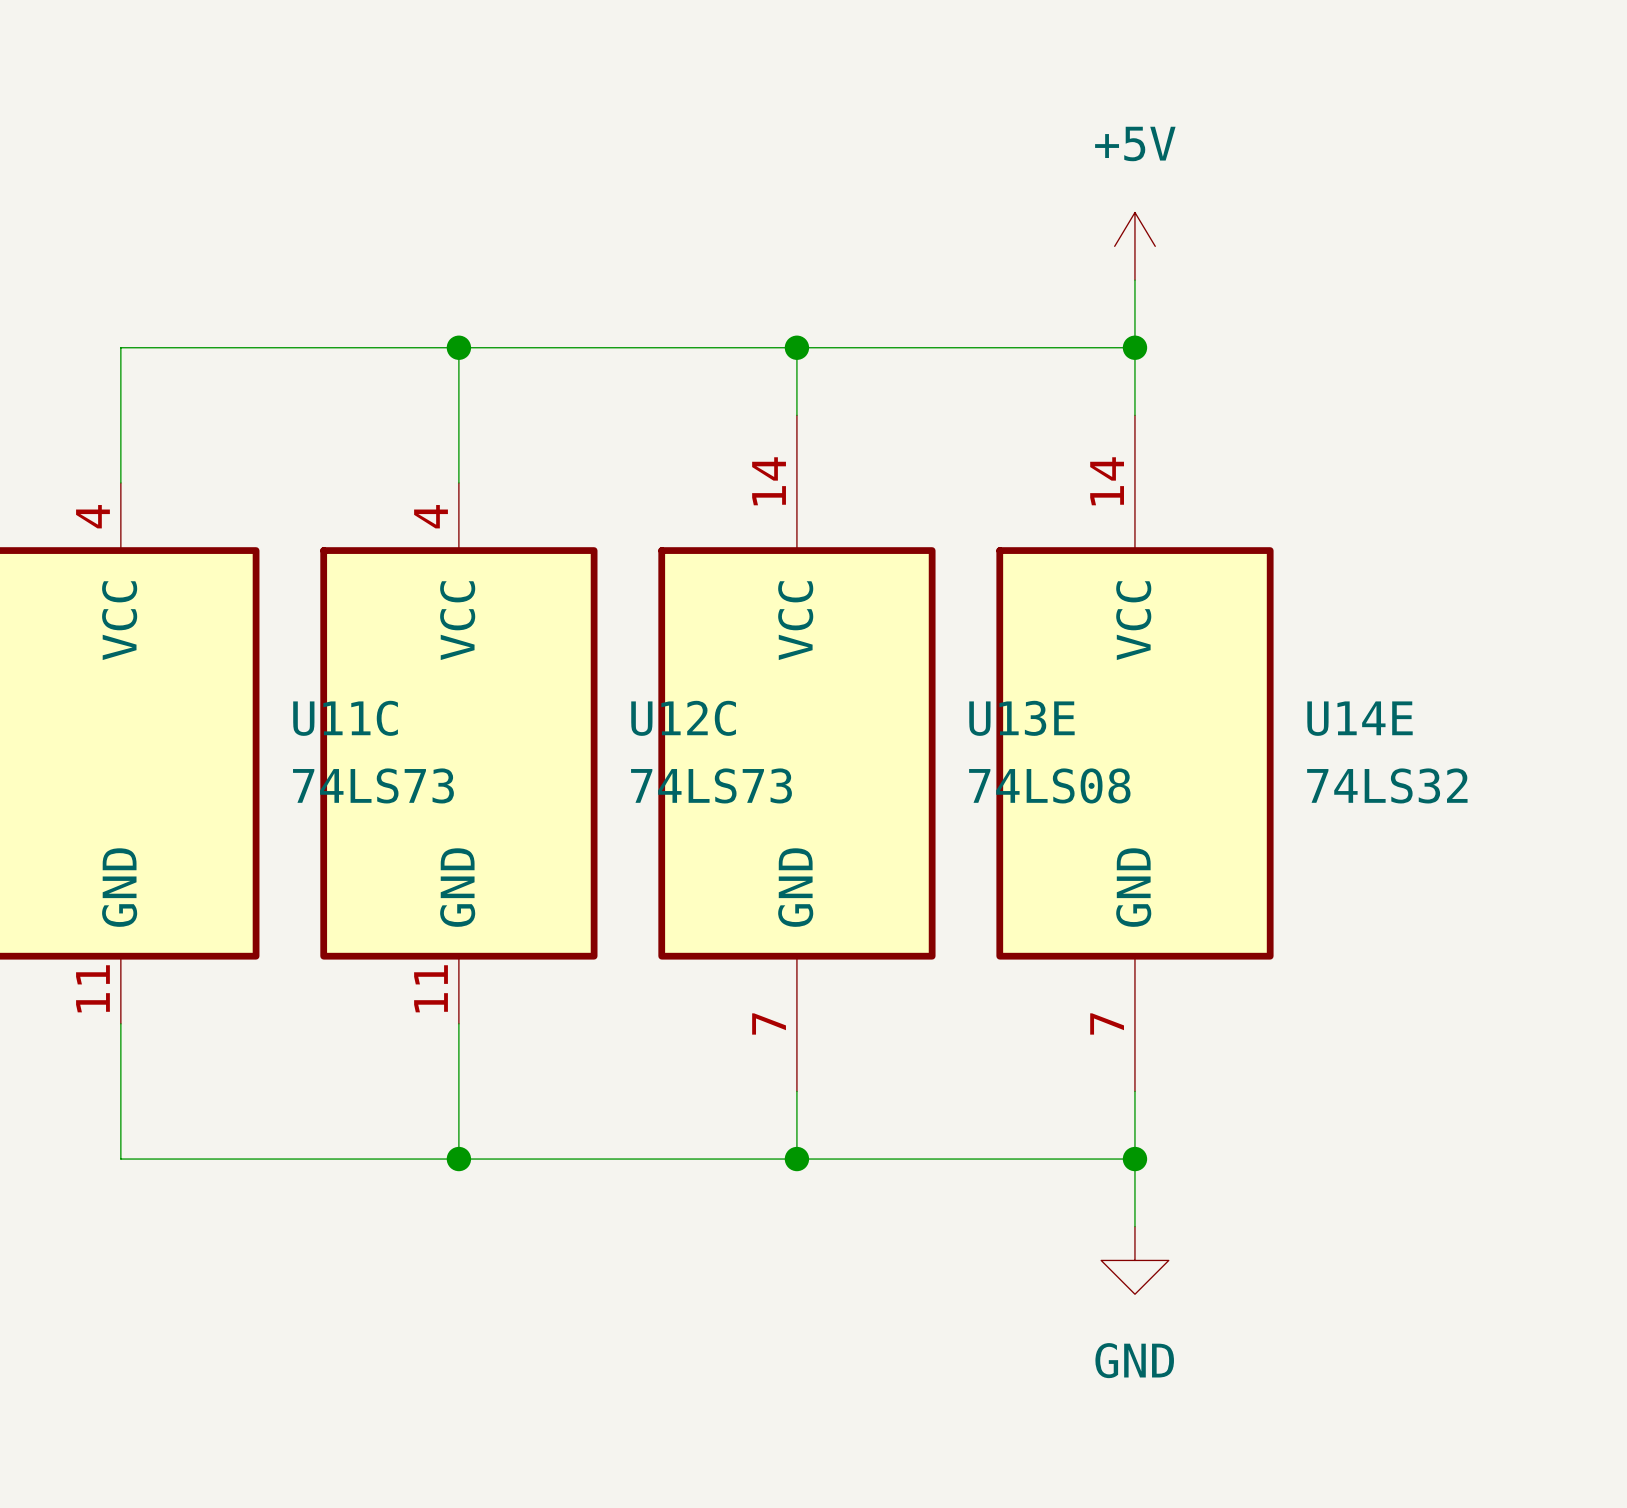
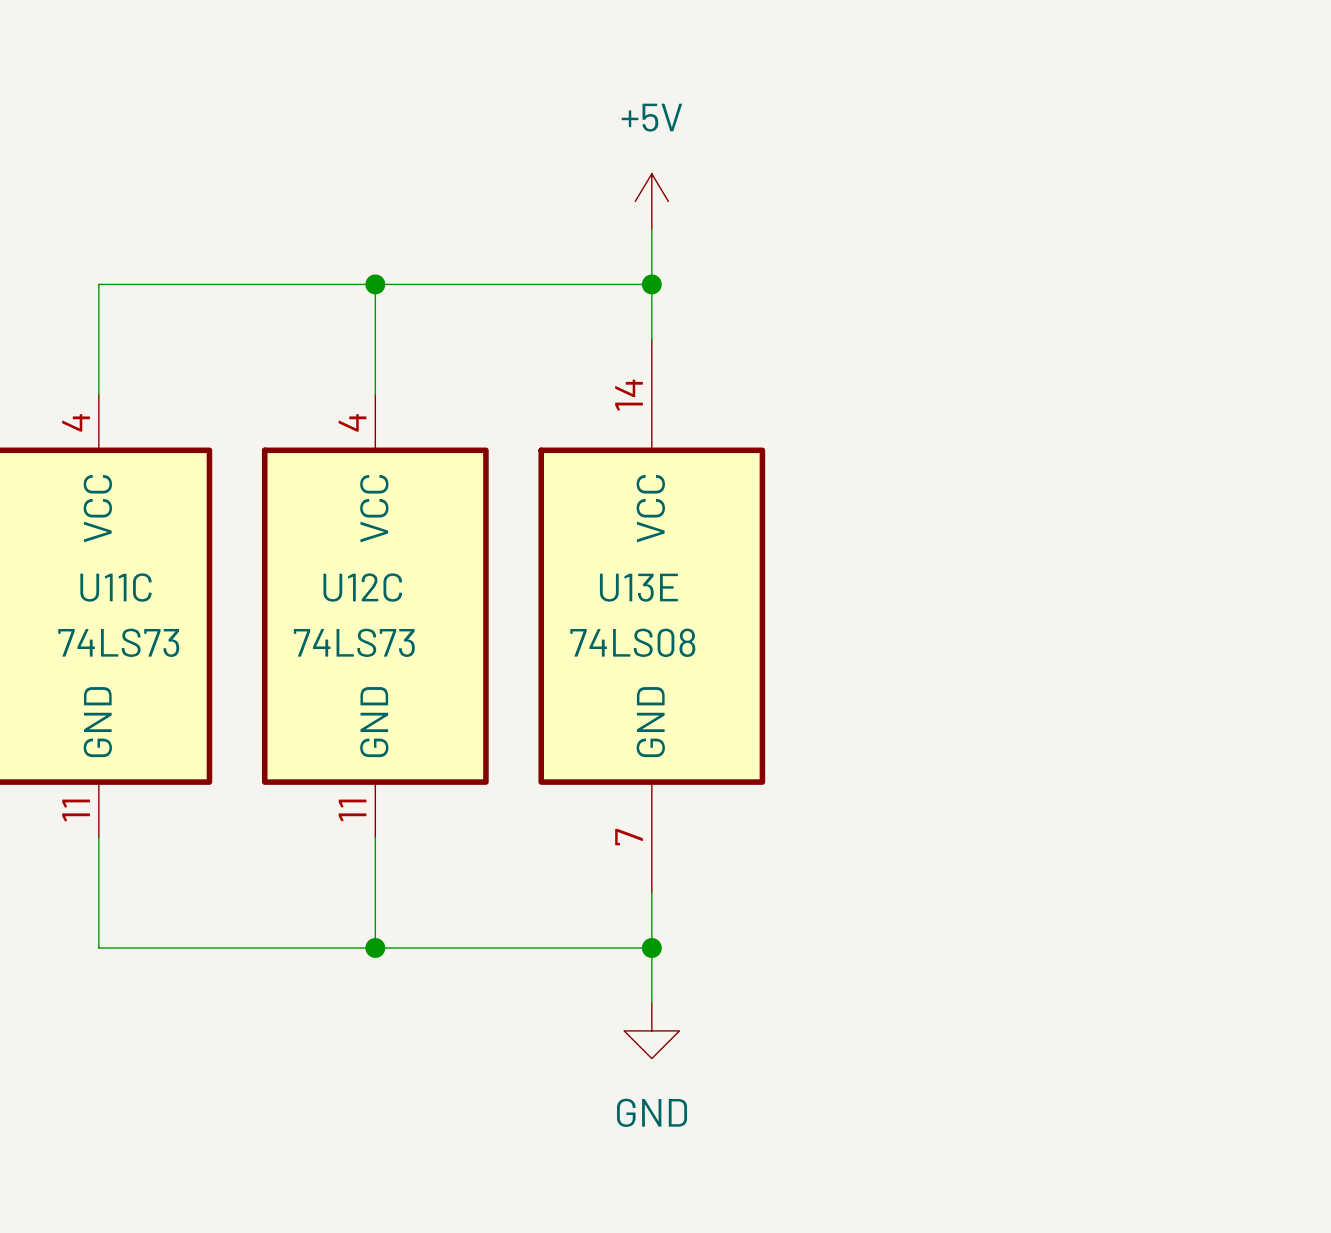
power symbol position: +5V (1134, 246) -> +5V (651, 201)
wire: (1134, 280) (1134, 415) -> none
wire: (796, 347) (1134, 347) -> (651, 284) (651, 229)
junction: (1134, 347) -> none
U11C name position: U11C (345, 718) -> U11C (115, 587)
U12C name position: U12C (683, 718) -> U12C (362, 587)
U13E name position: U13E (1021, 718) -> U13E (638, 587)
U14E: 74LS32 (1134, 753) -> none
U11C value position: 74LS73 (373, 785) -> 74LS73 (118, 642)
U12C value position: 74LS73 (711, 785) -> 74LS73 (354, 642)
U13E value position: 74LS08 (1049, 785) -> 74LS08 (632, 642)
wire: (1134, 1091) (1134, 1226) -> none
wire: (796, 1159) (1134, 1159) -> (651, 947) (651, 1003)
junction: (1134, 1159) -> none
power symbol position: GND (1134, 1260) -> GND (651, 1030)

